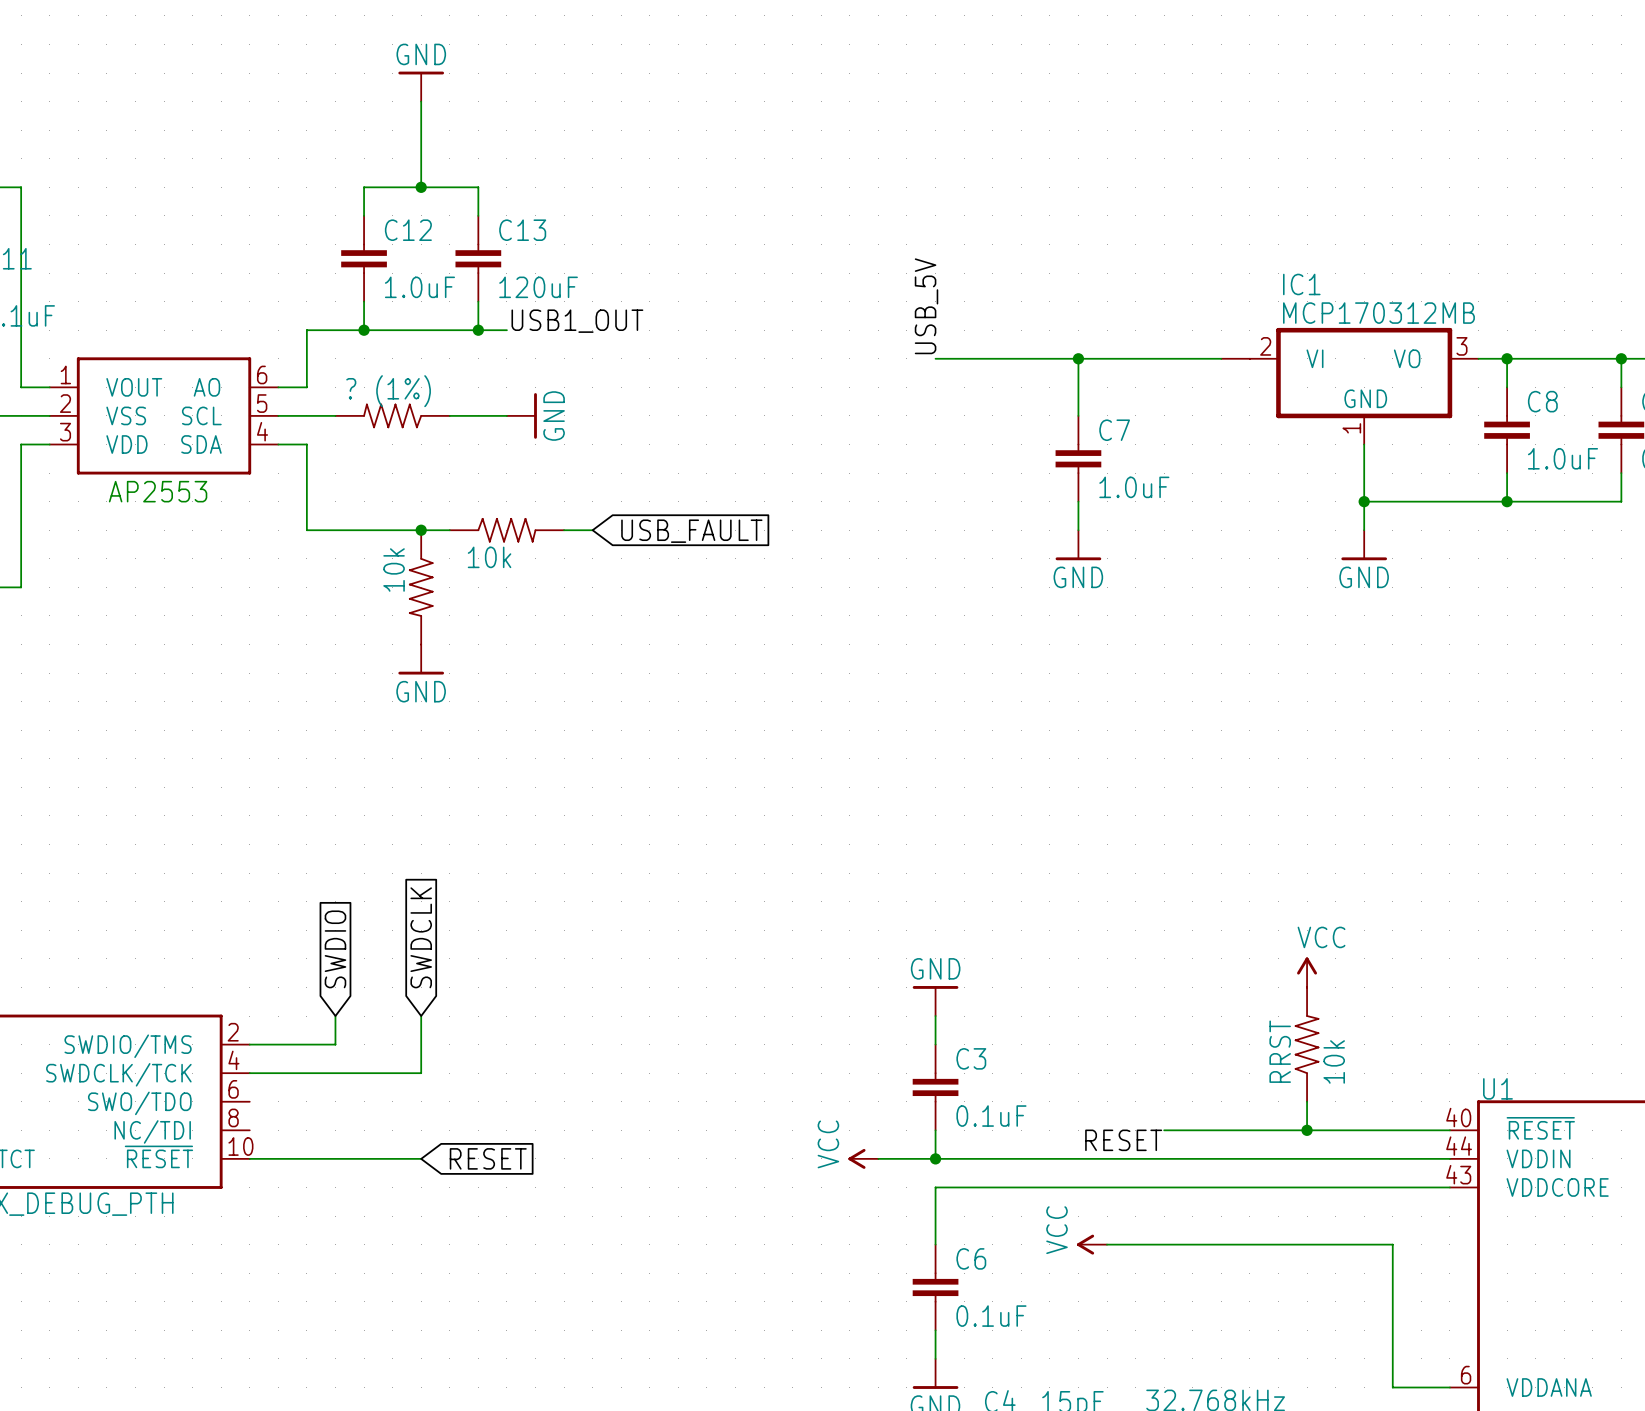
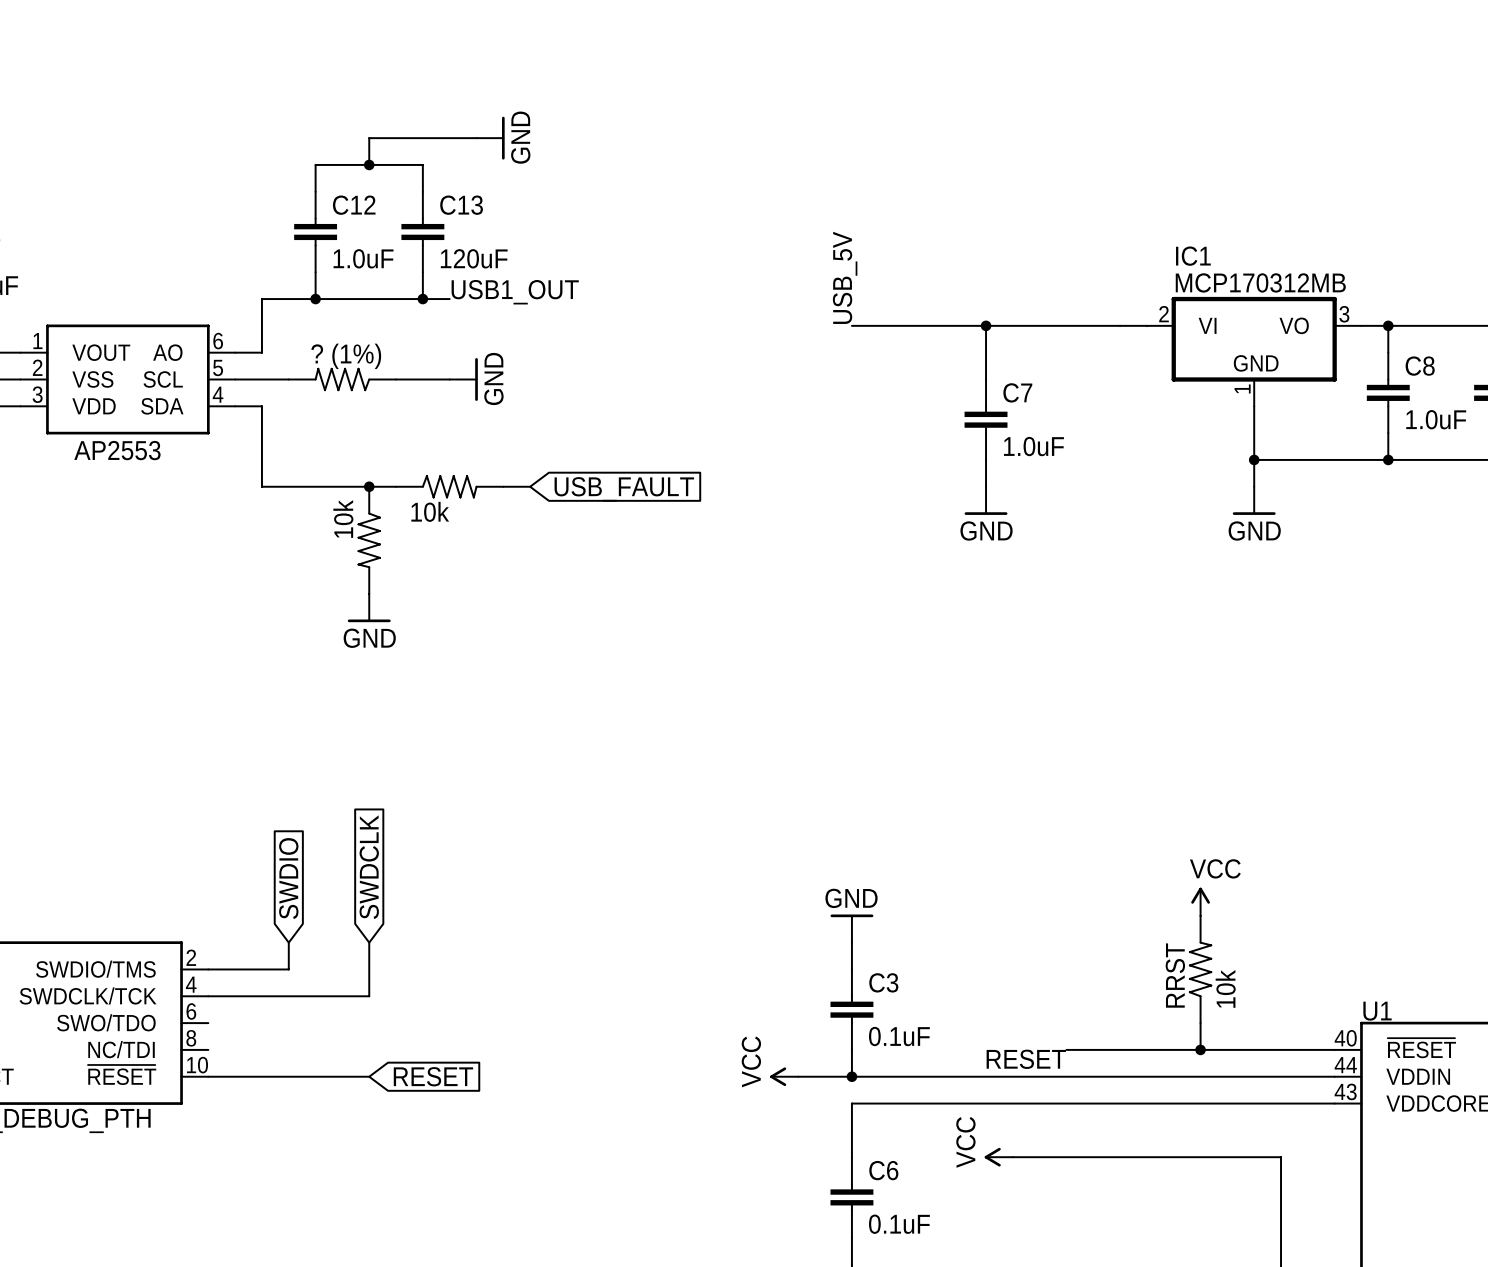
power symbol rotation: 0° (421, 73) -> 90° clockwise (503, 138)
power symbol position: GND (421, 86) -> GND (490, 138)
wire: (421, 101) (421, 158) -> (476, 138) (369, 138)

